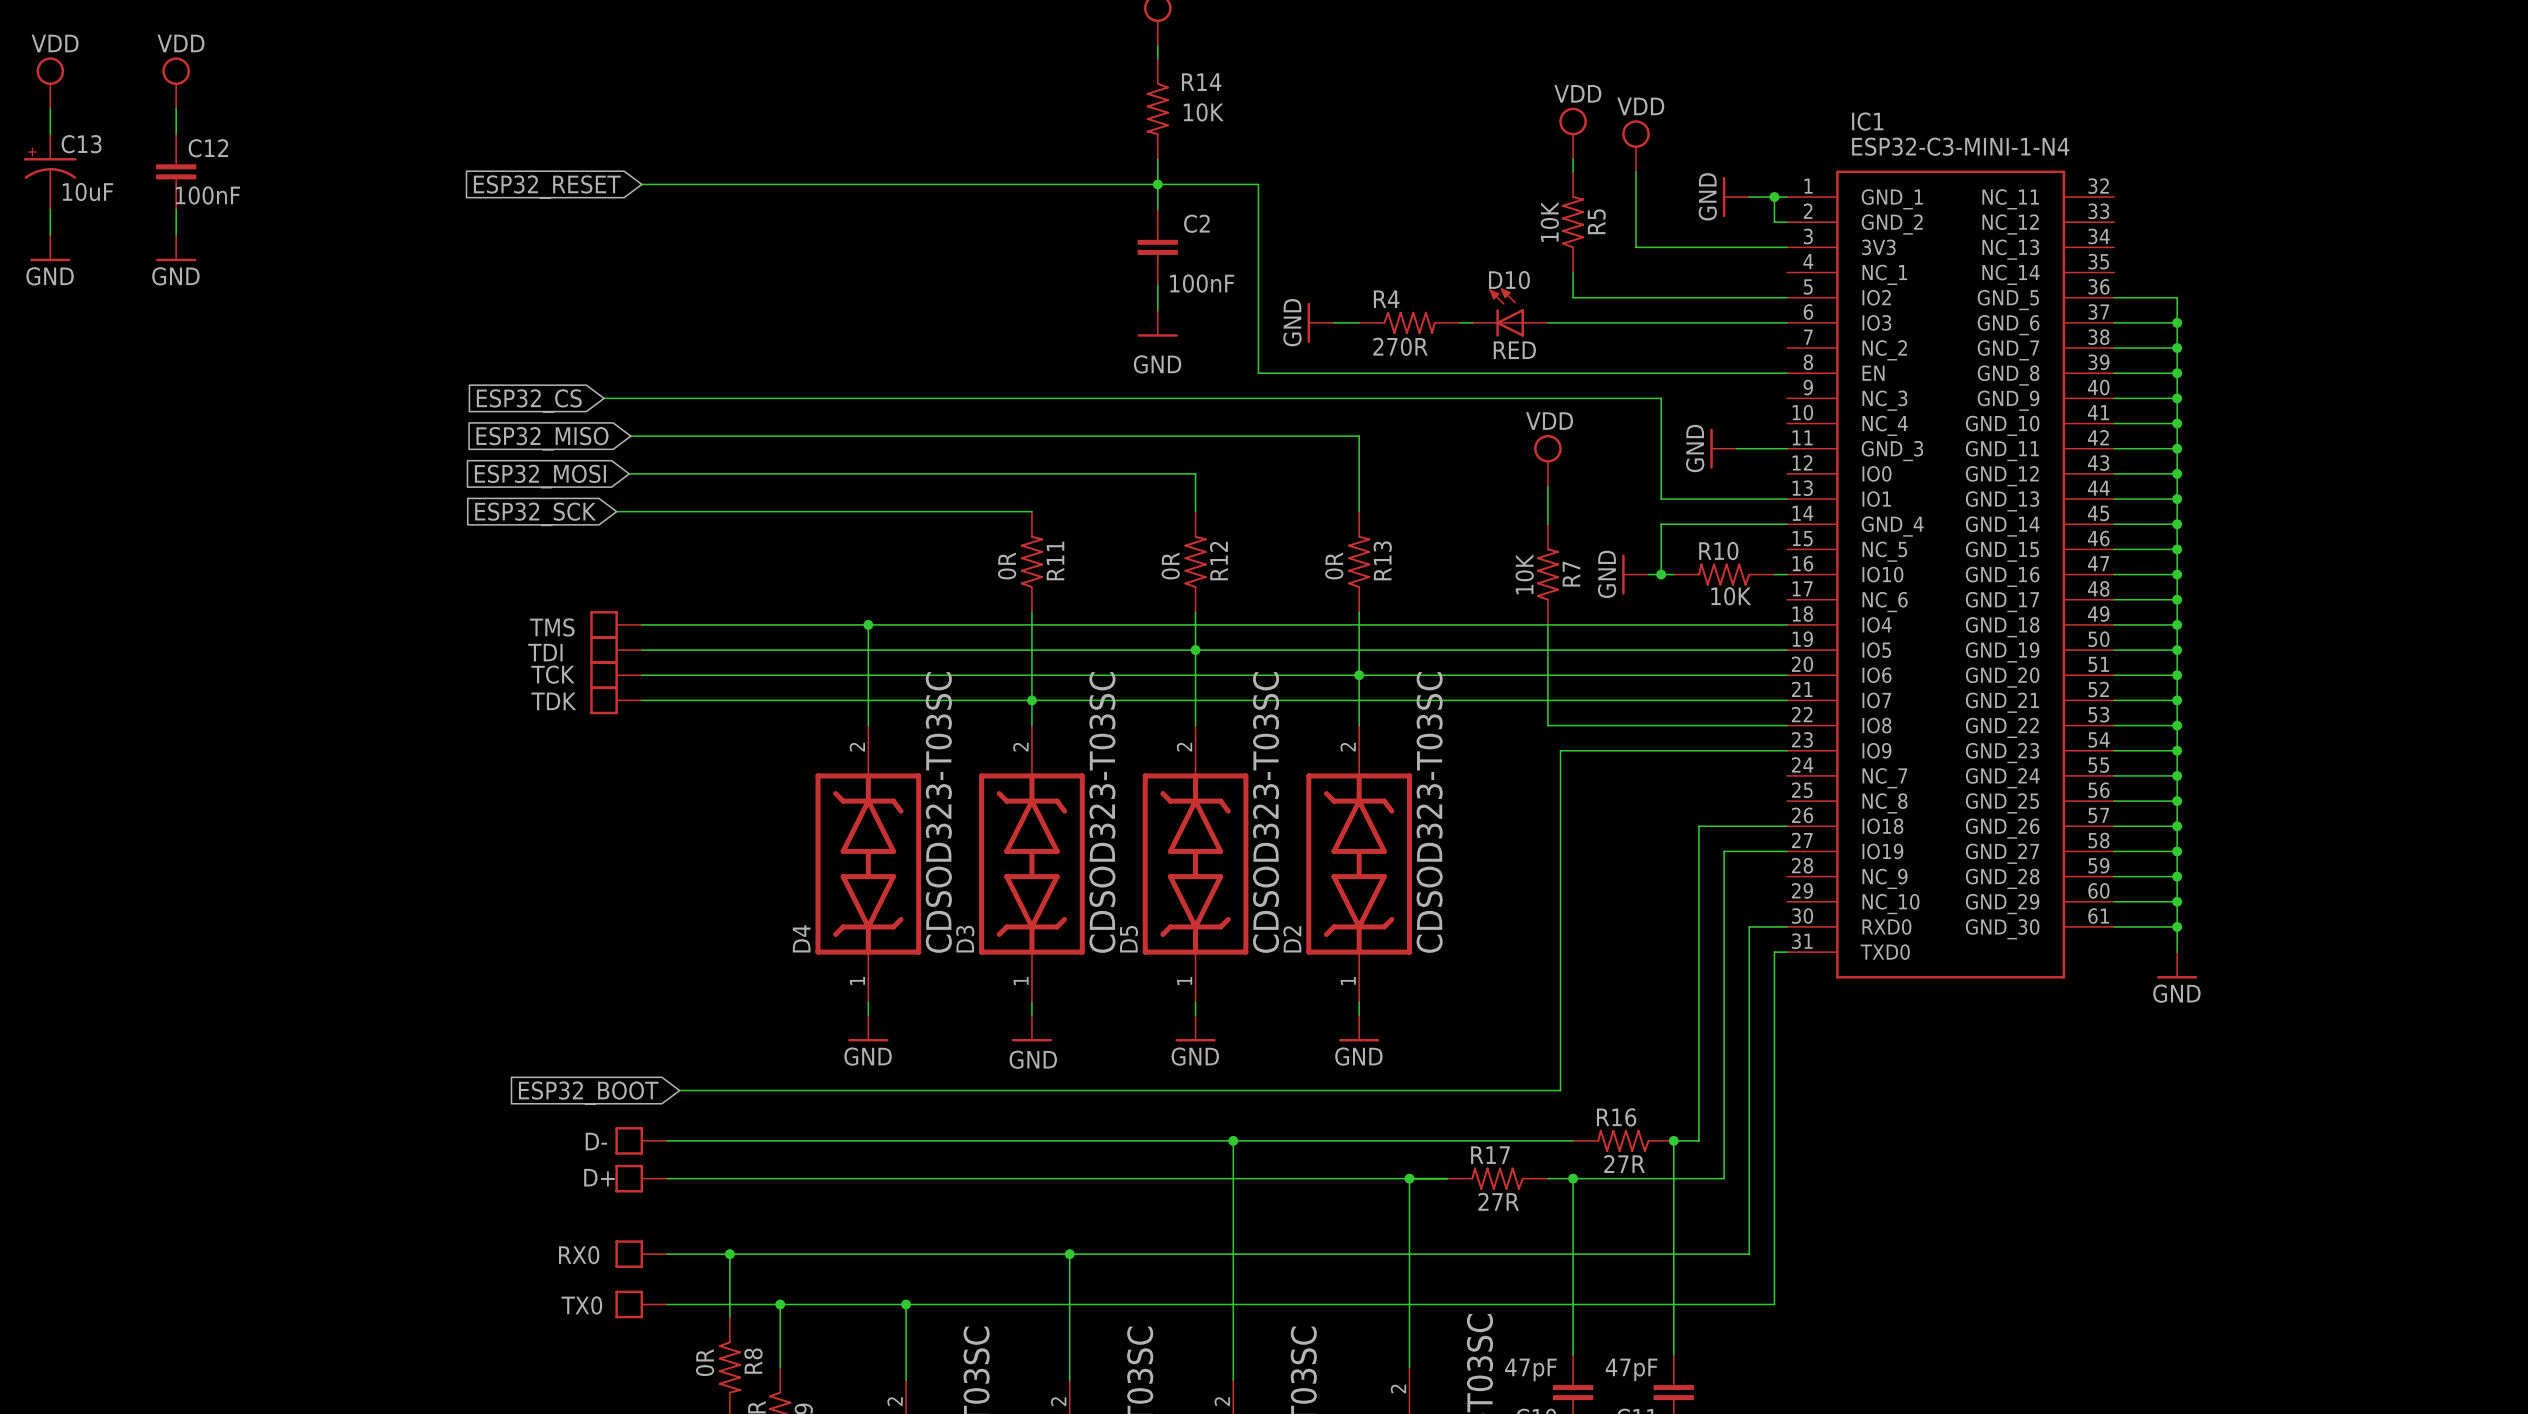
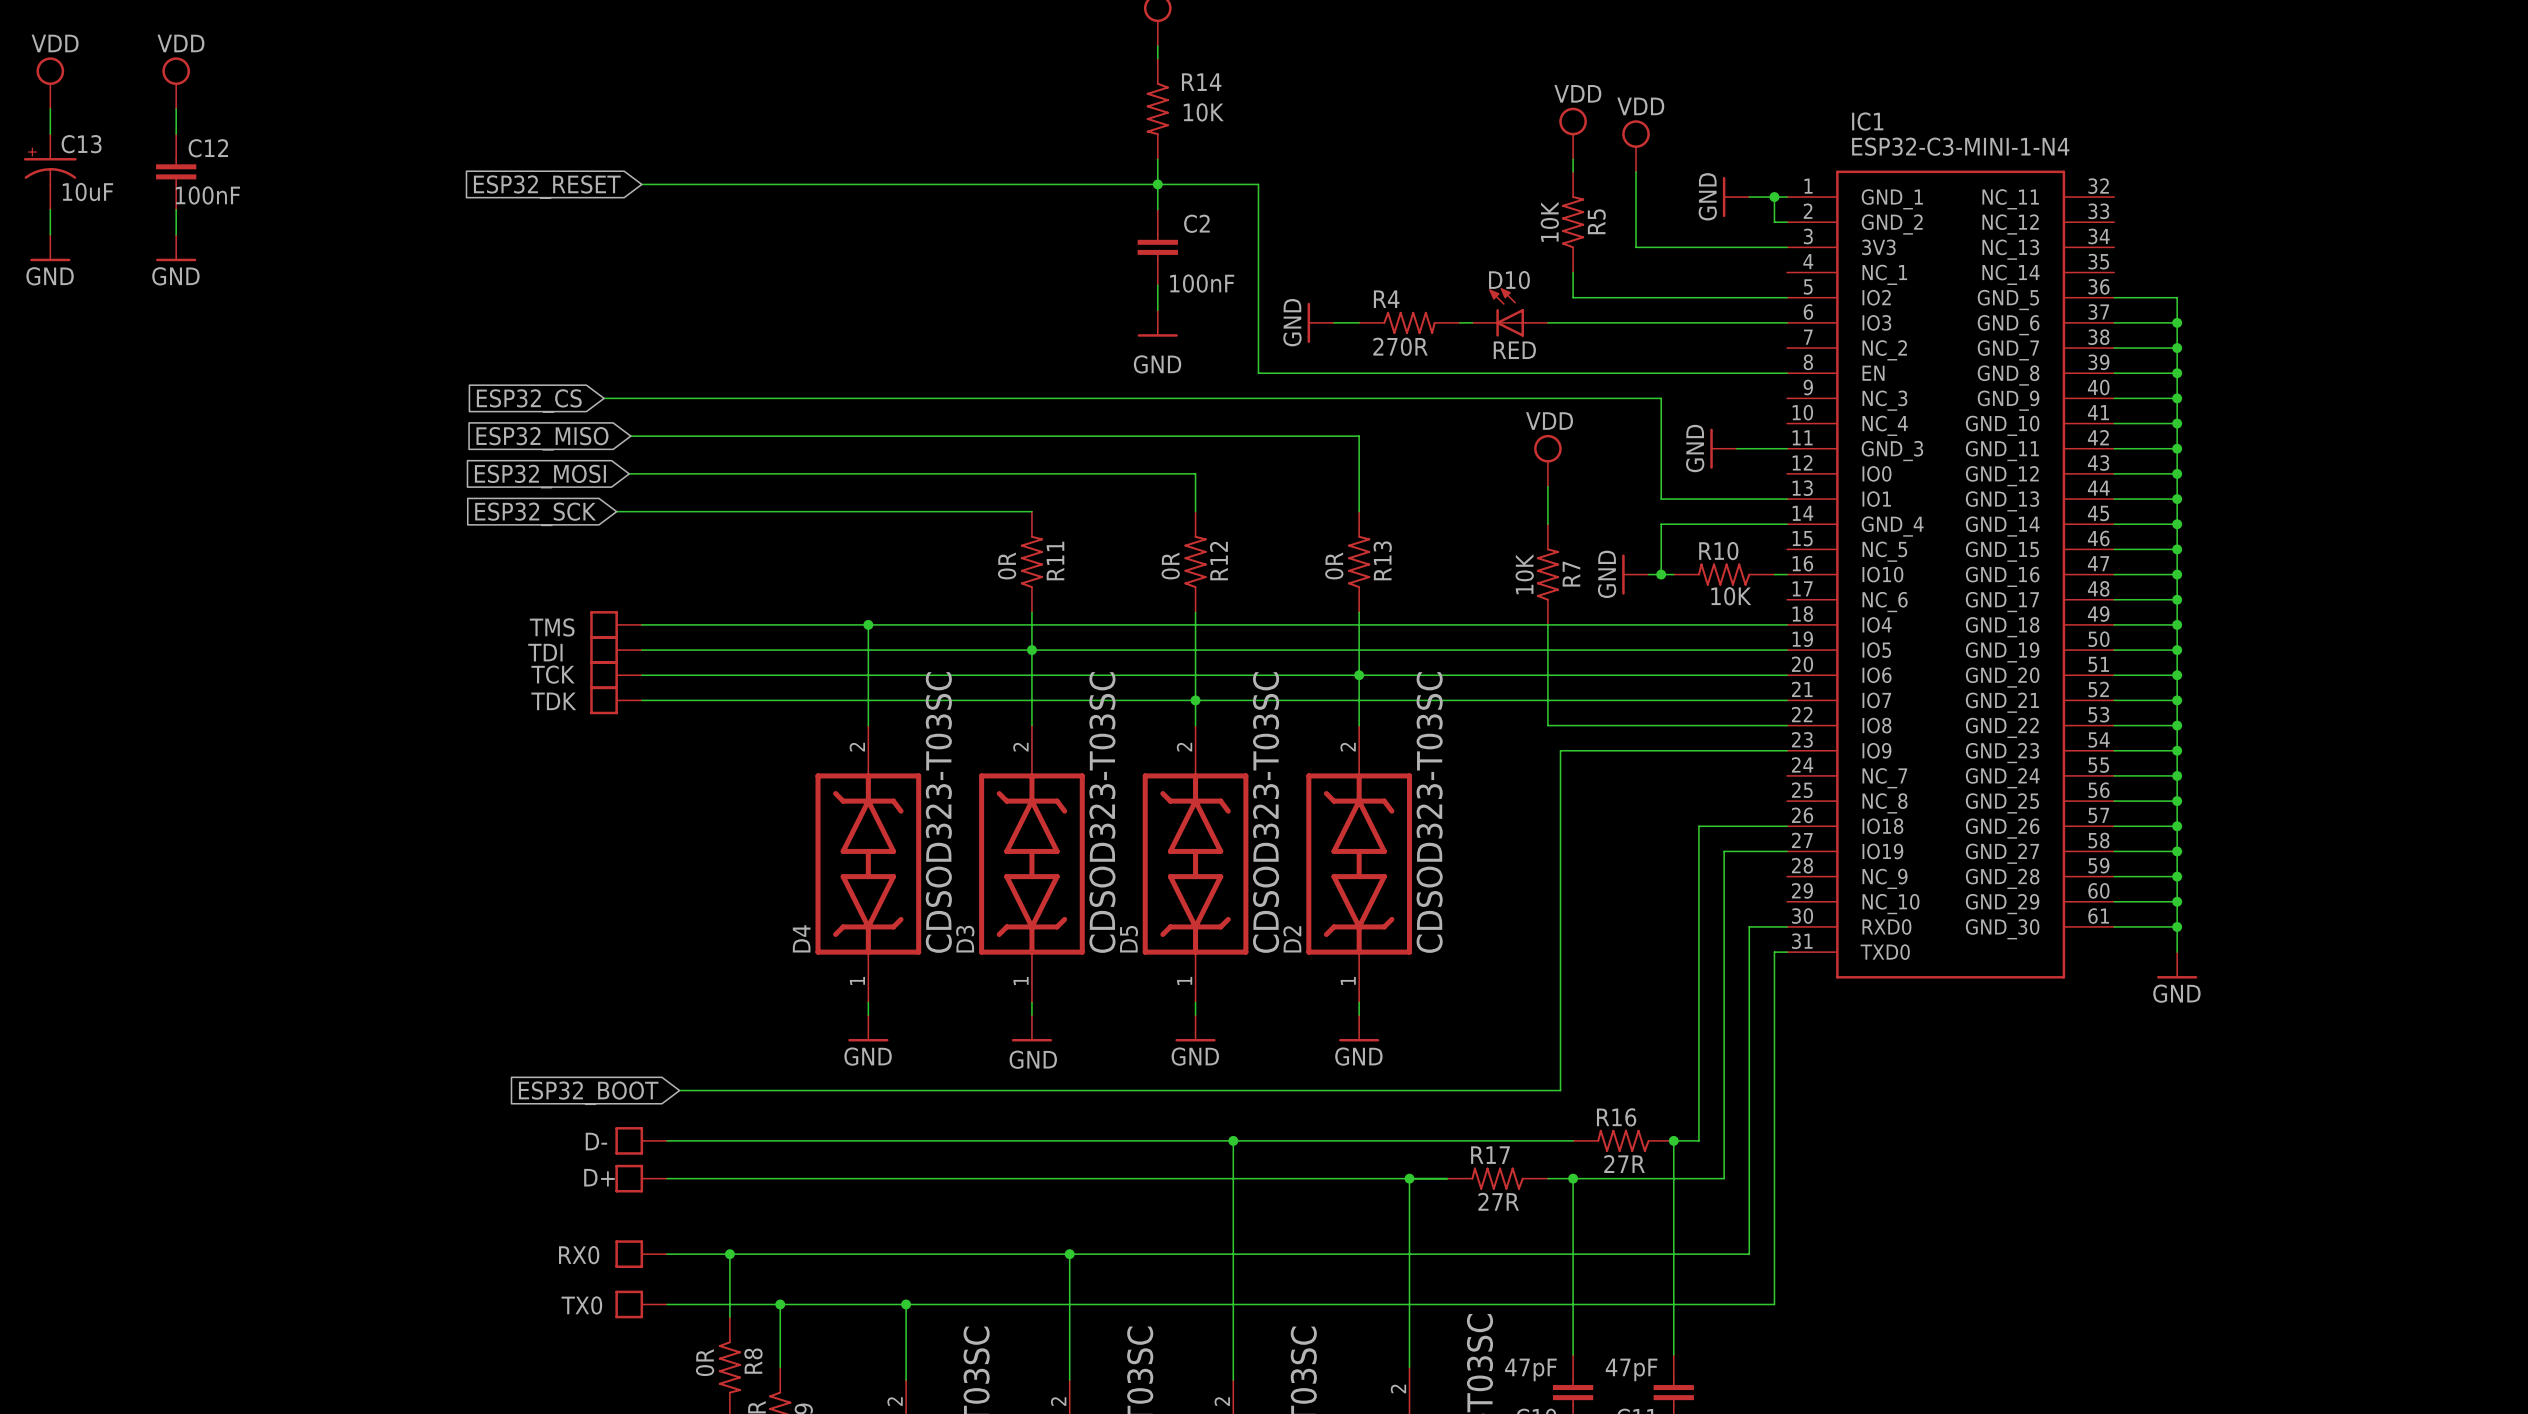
junction position: (1195, 650) -> (1195, 700)
junction position: (1031, 700) -> (1031, 650)

